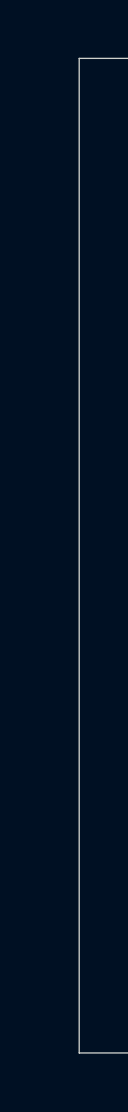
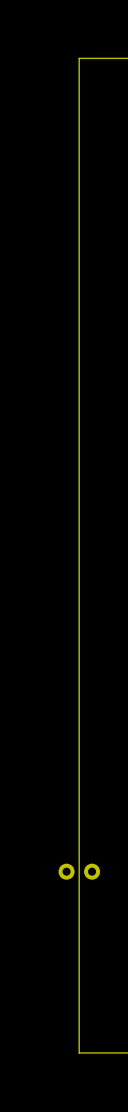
part: none -> (79, 871)

